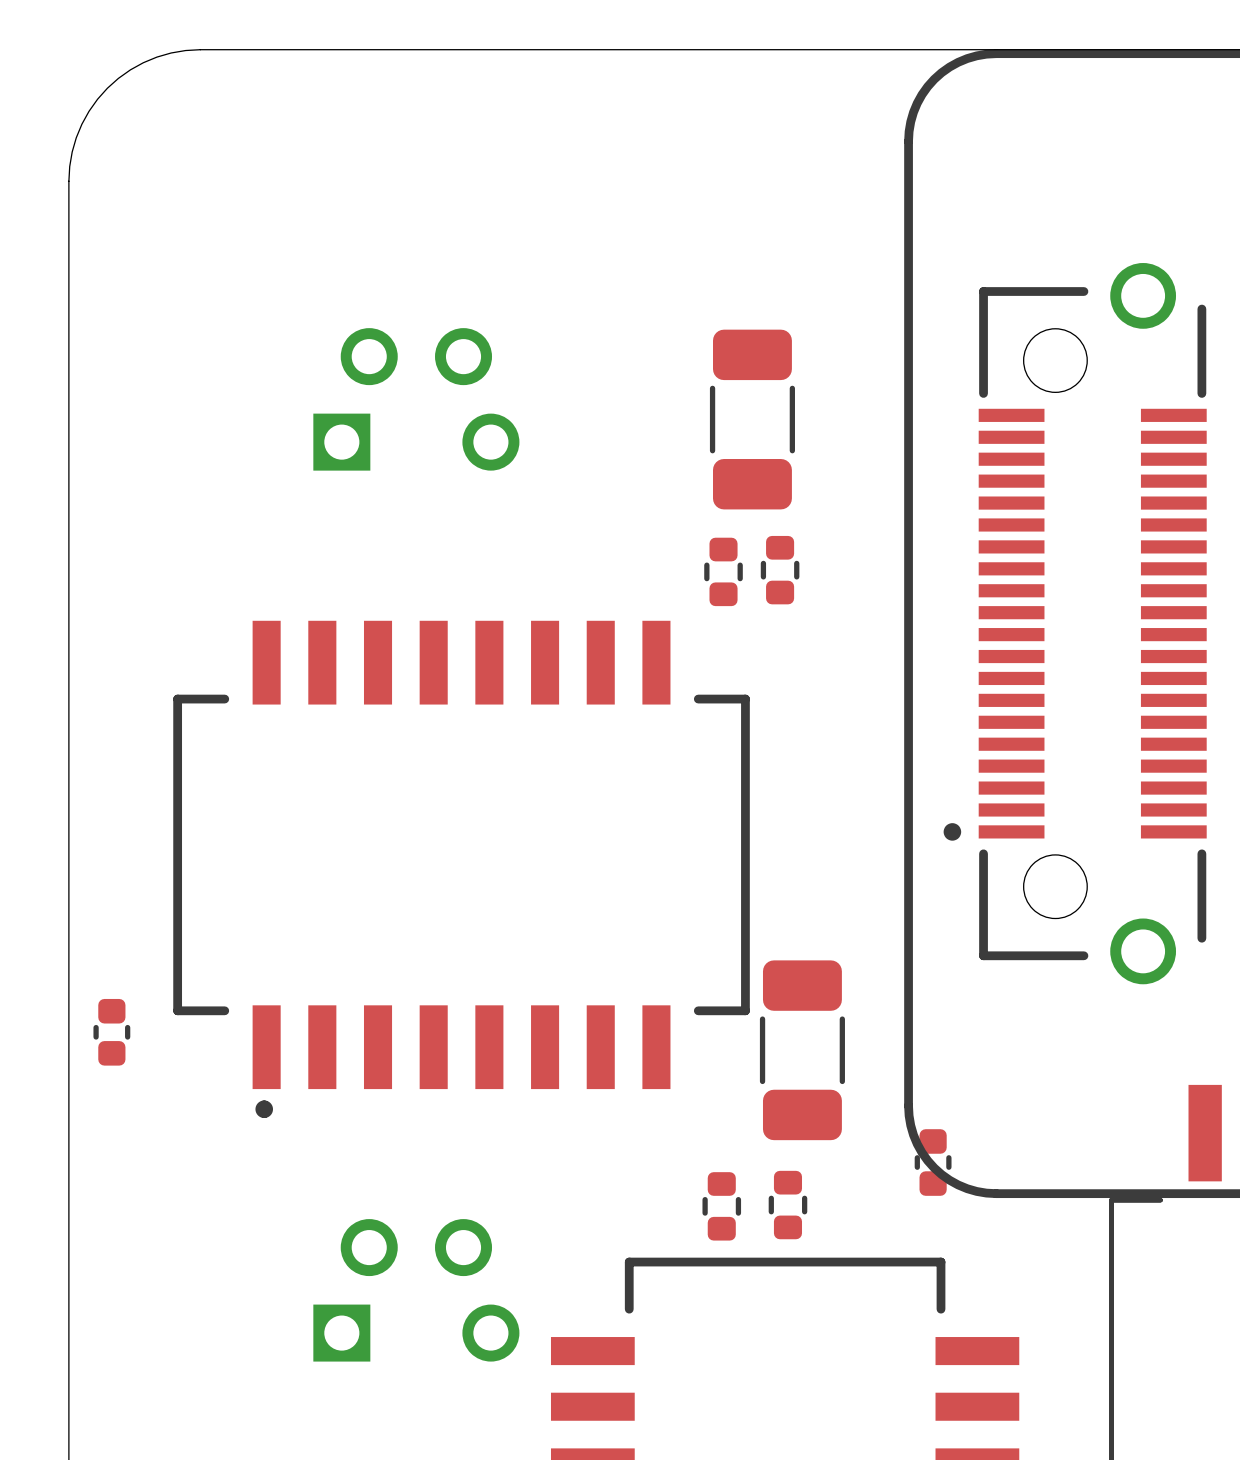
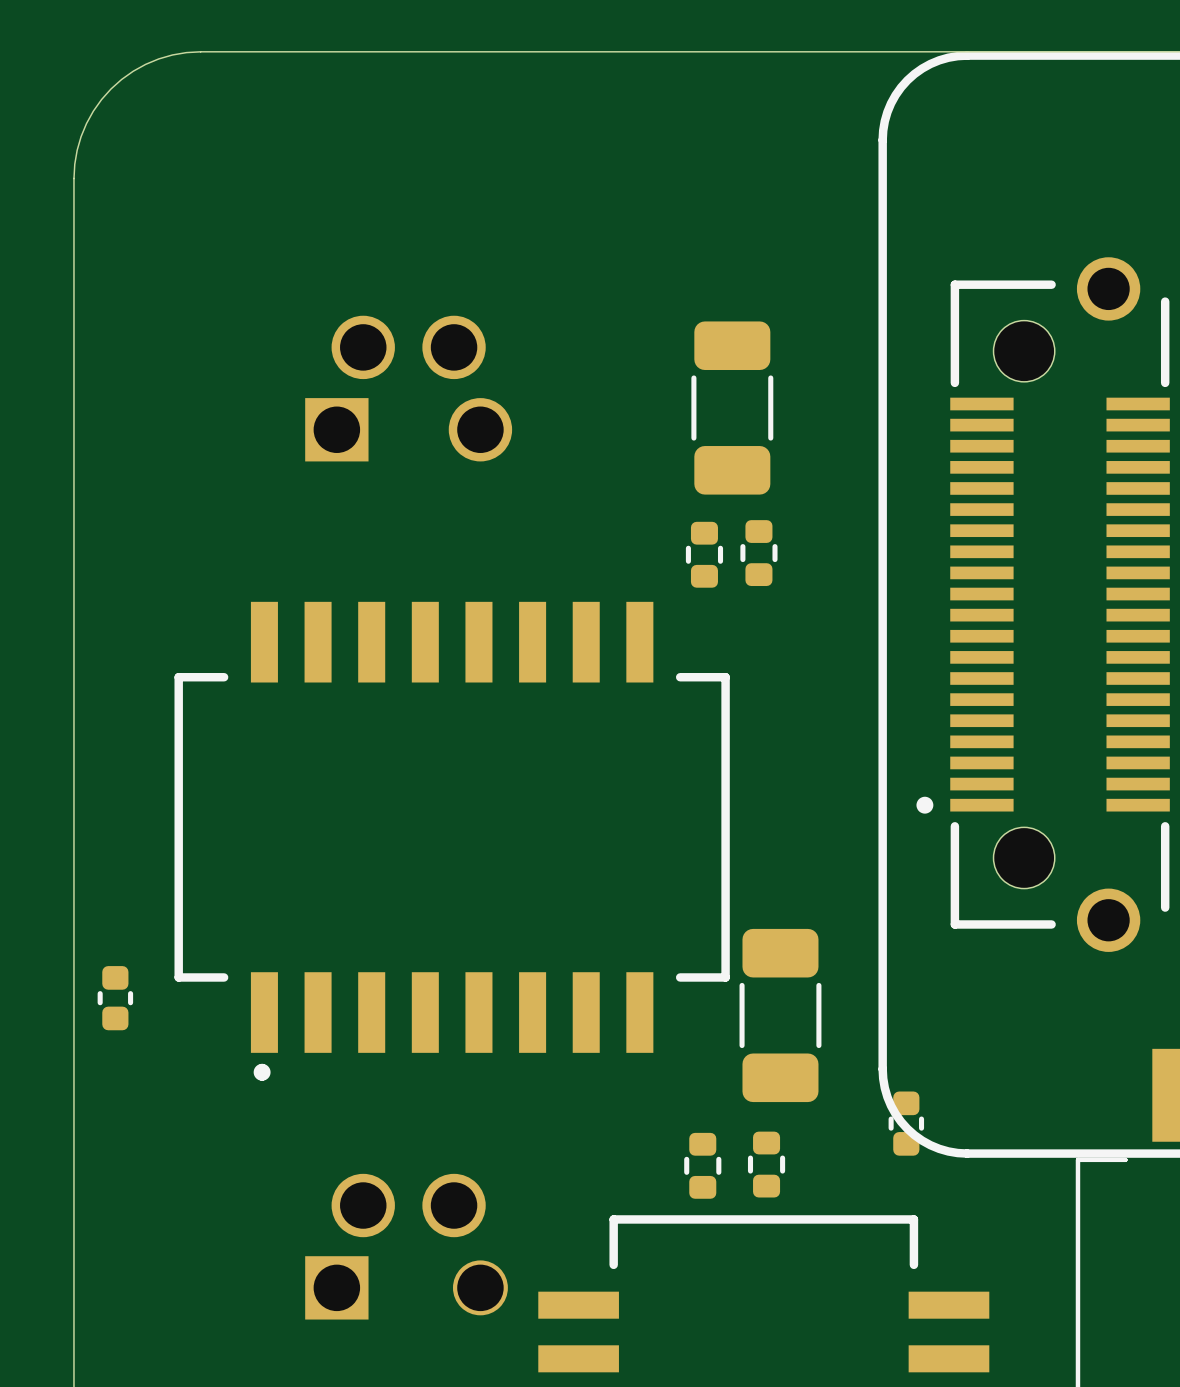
part footprint: [313, 328, 520, 471] -> [305, 315, 513, 462]
part footprint: [313, 1219, 520, 1362] -> [305, 1173, 508, 1320]

